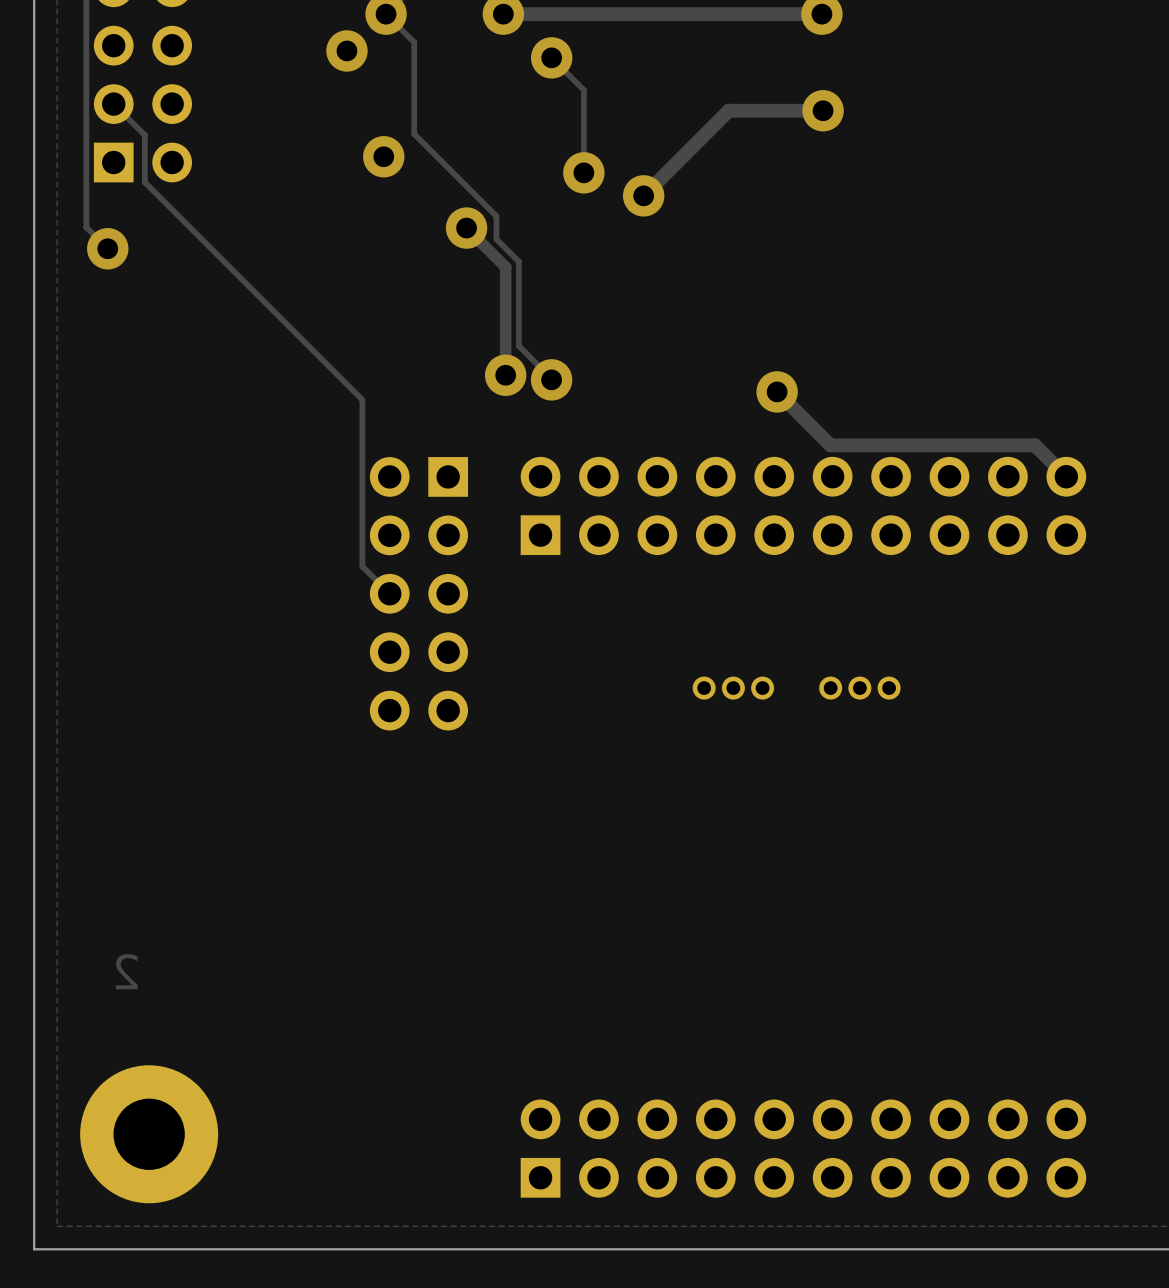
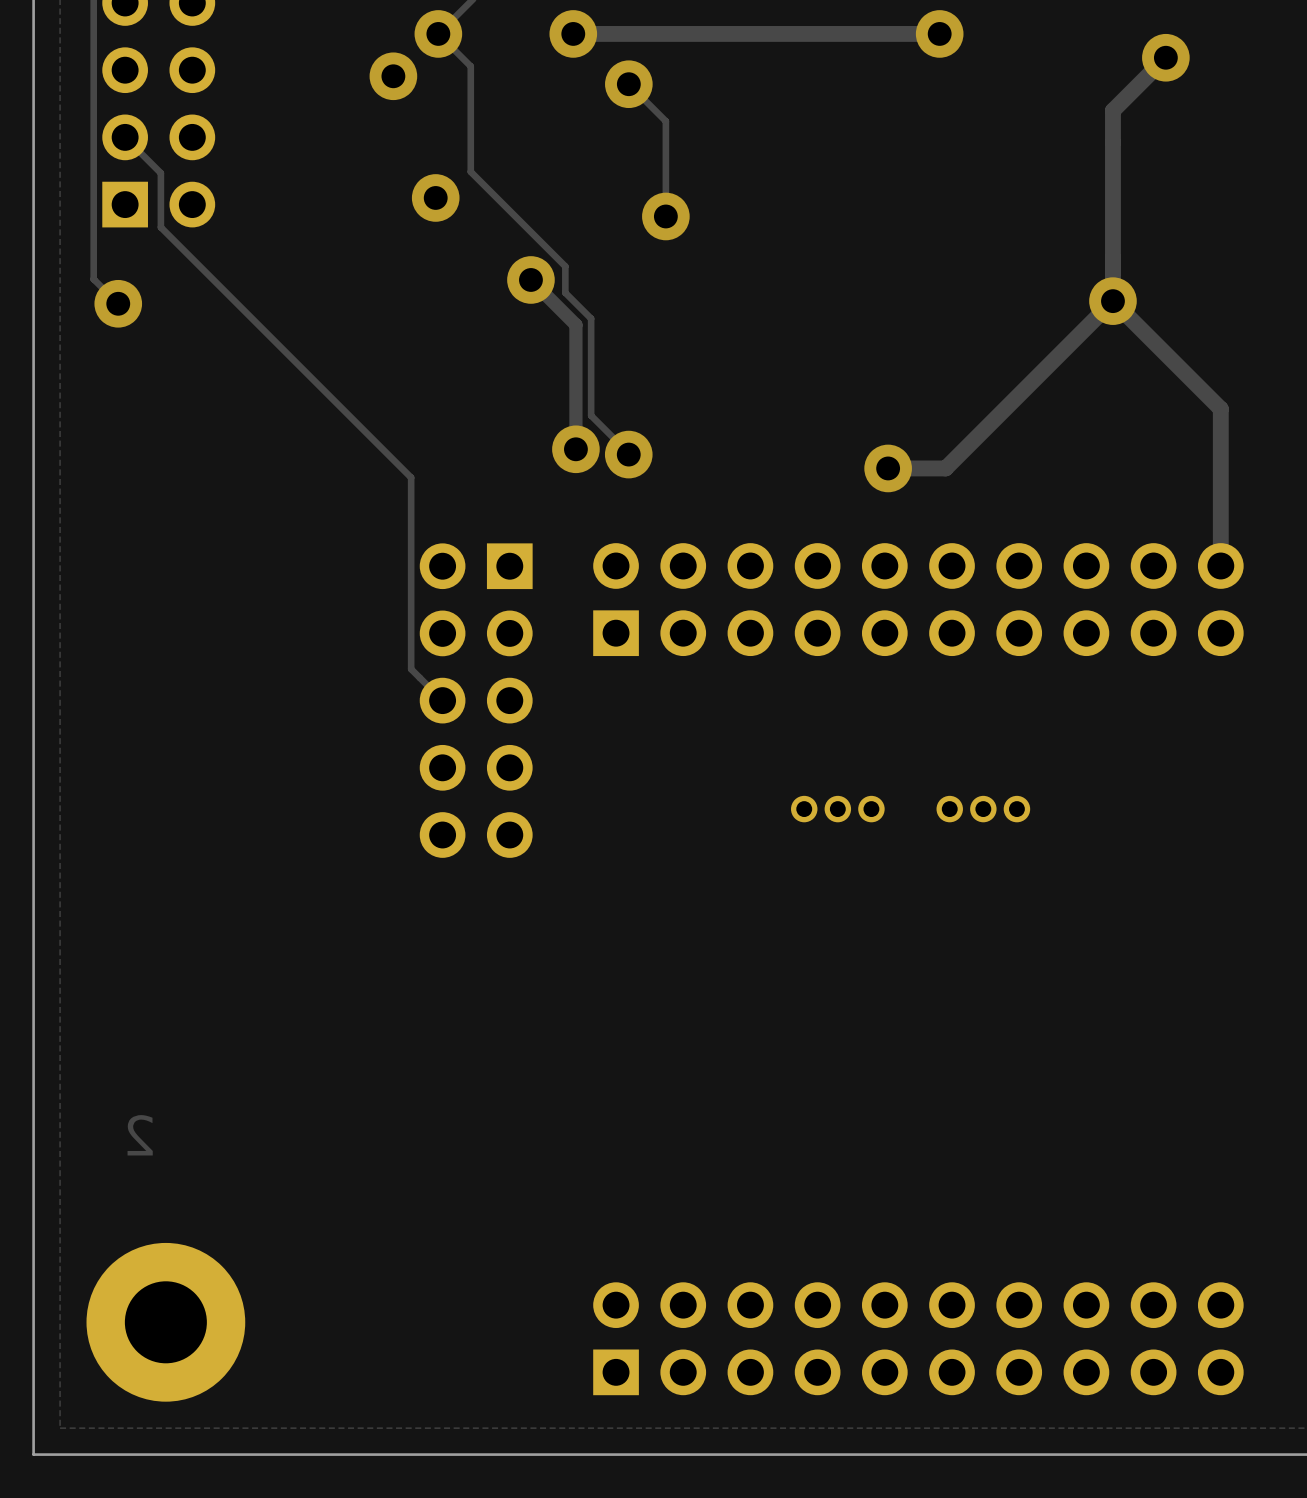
track: none -> (1165, 57) (1112, 110) (1112, 301)
via: none -> (1165, 57)
track: (823, 110) (728, 110) (643, 195) -> none
via: (823, 110) -> none
via: (643, 195) -> none
track: none -> (1112, 301) (945, 468) (888, 468)
via: none -> (1112, 301)
track: (777, 391) (830, 445) (1034, 445) (1066, 476) -> (1112, 301) (1220, 408) (1220, 565)

